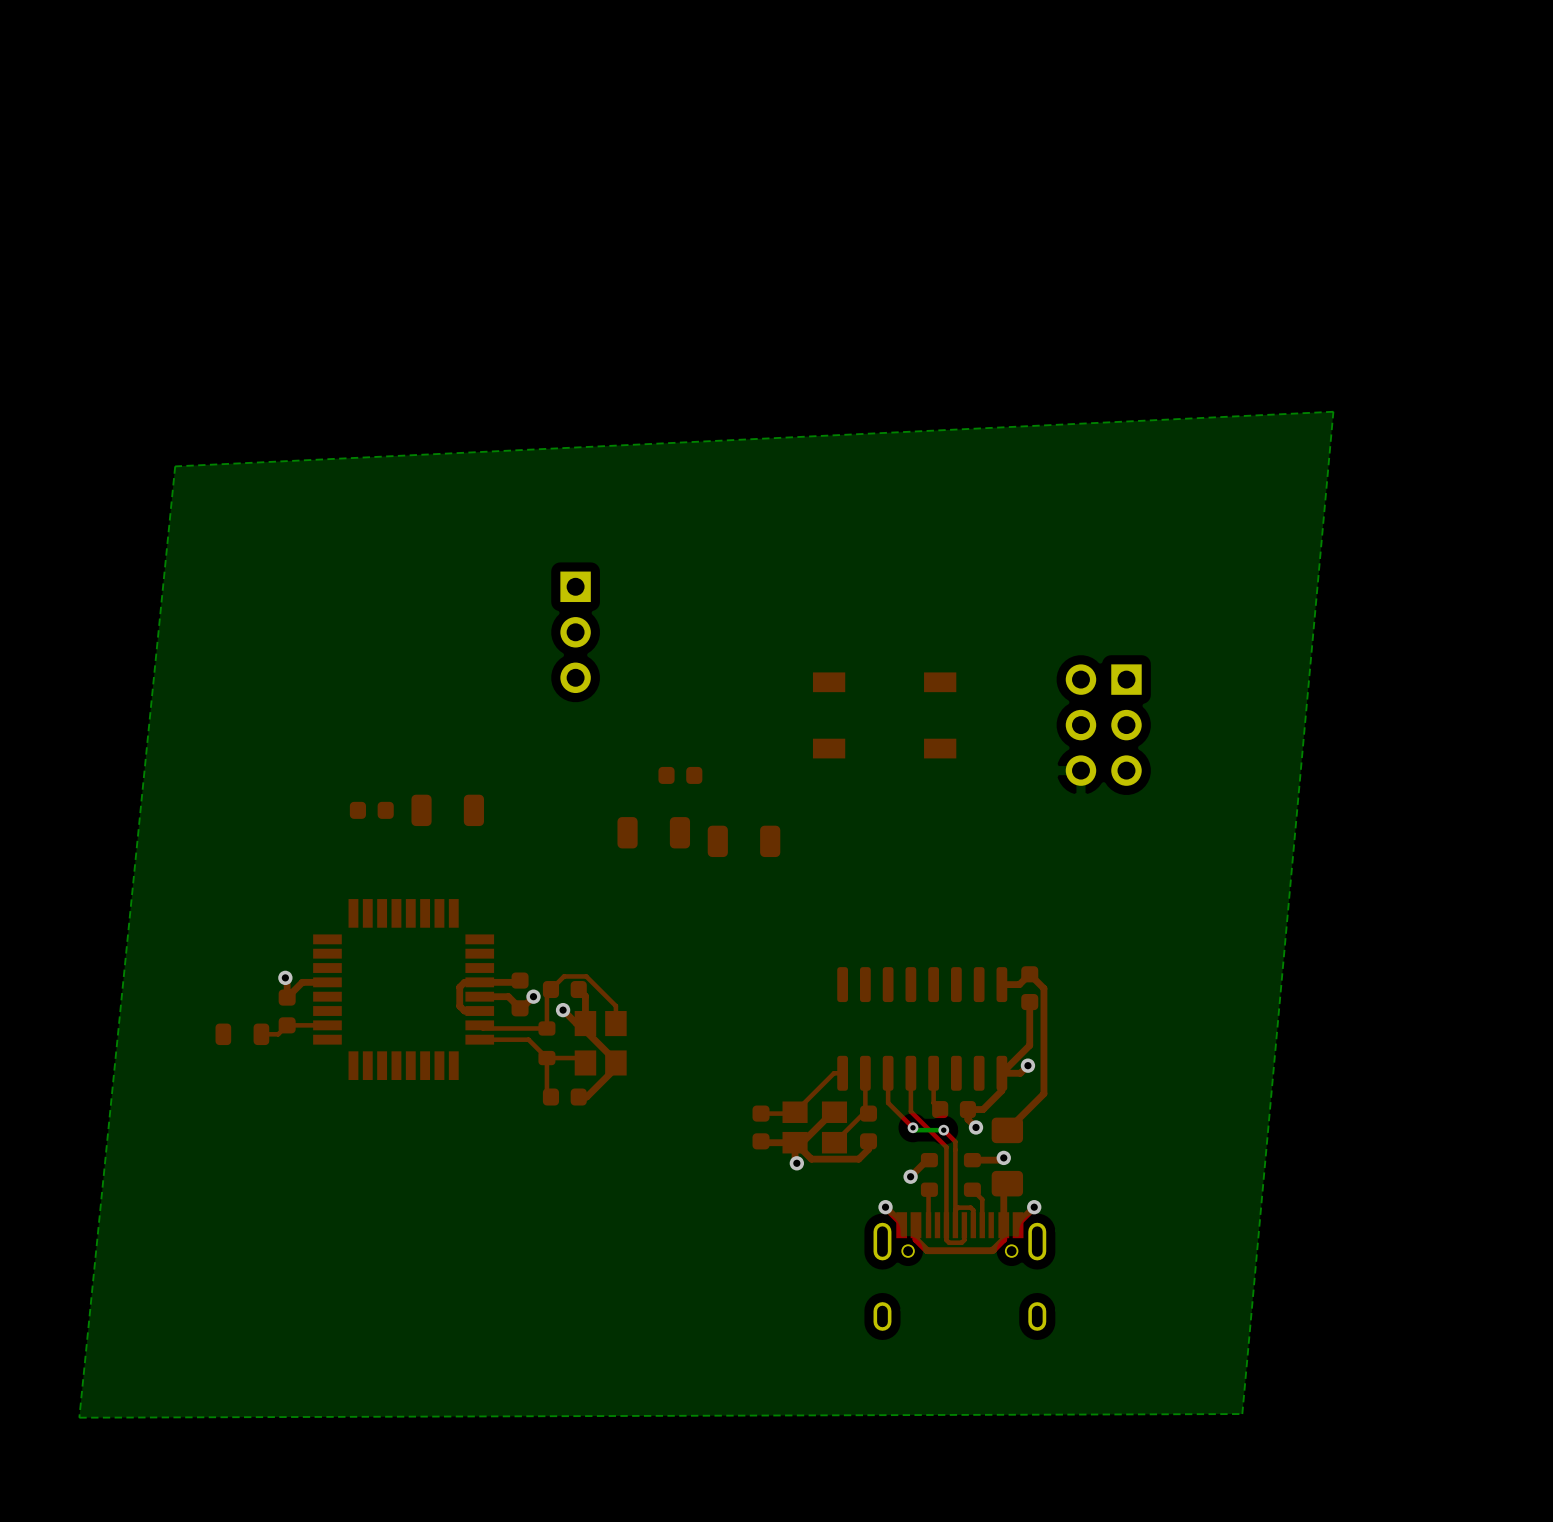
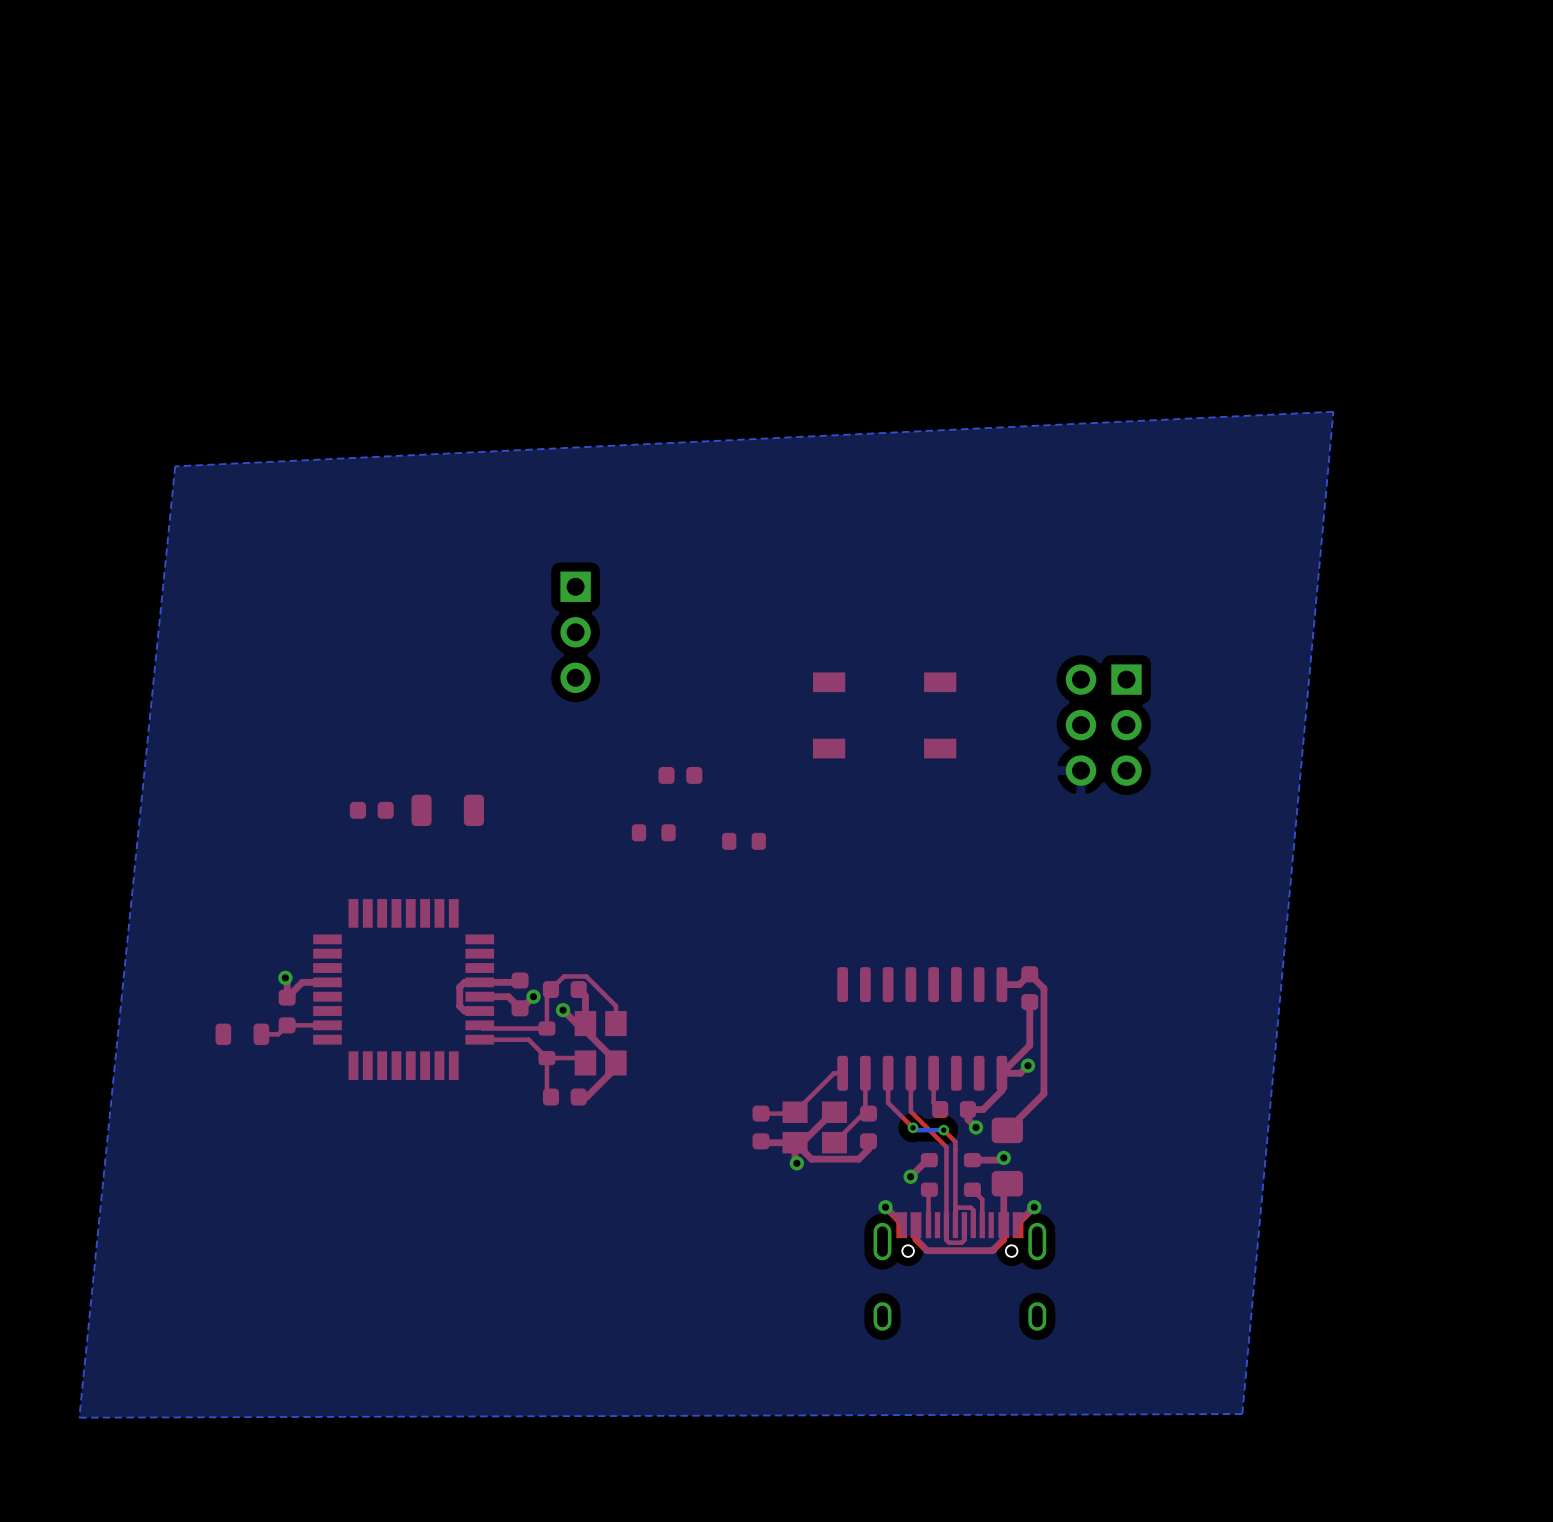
part footprint: [617, 817, 691, 849] -> [631, 824, 676, 842]
part footprint: [707, 825, 781, 858] -> [722, 832, 766, 850]

